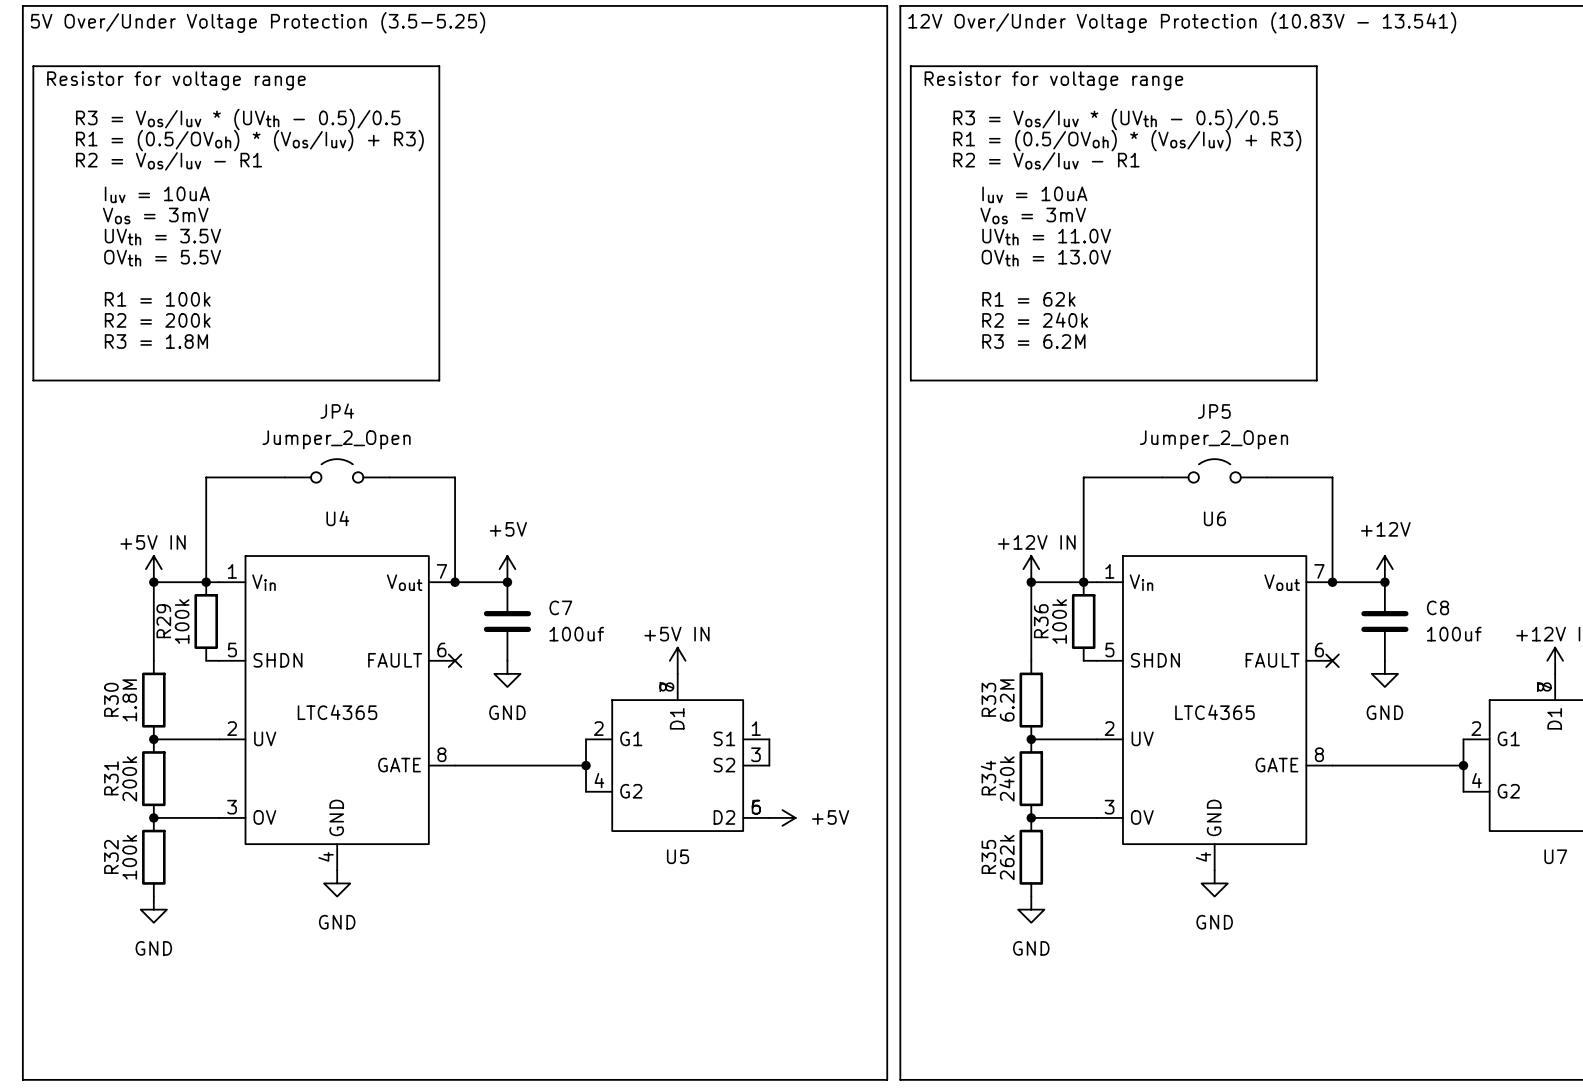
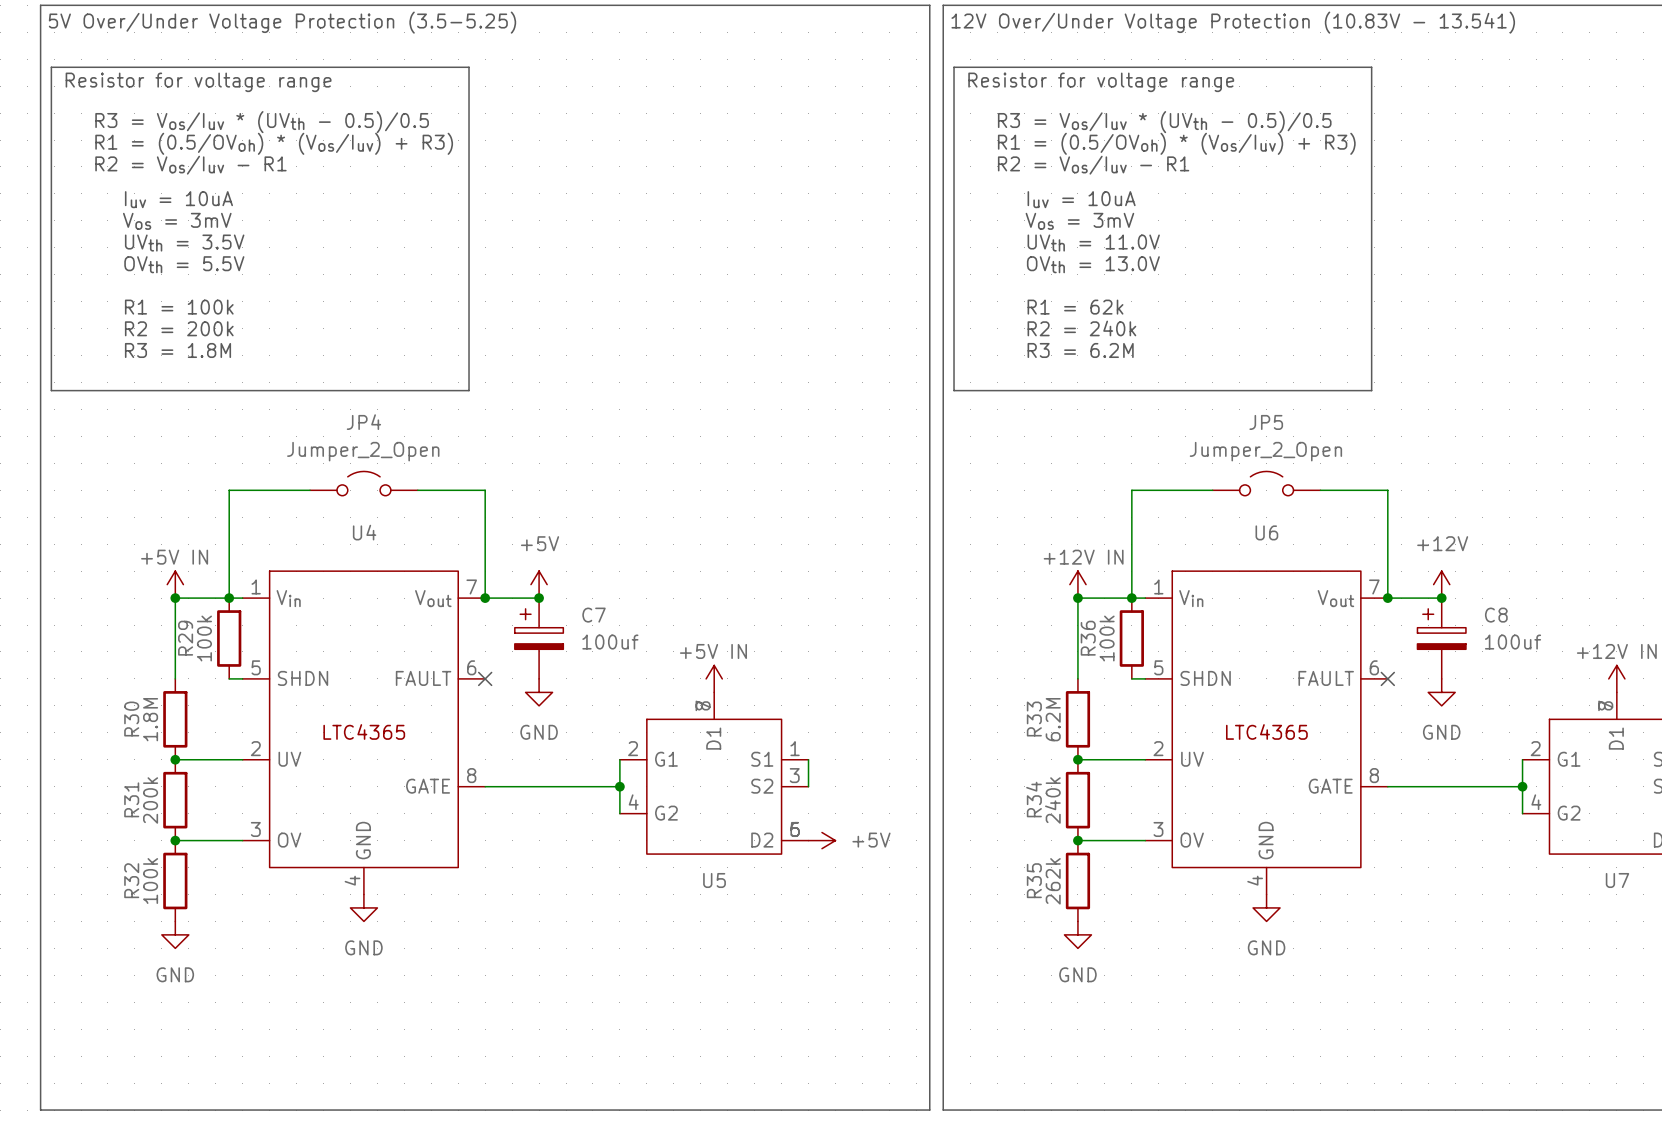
C7 symbol: [483, 582, 532, 661] -> [514, 598, 564, 679]
C8 symbol: [1361, 582, 1409, 661] -> [1417, 598, 1466, 679]

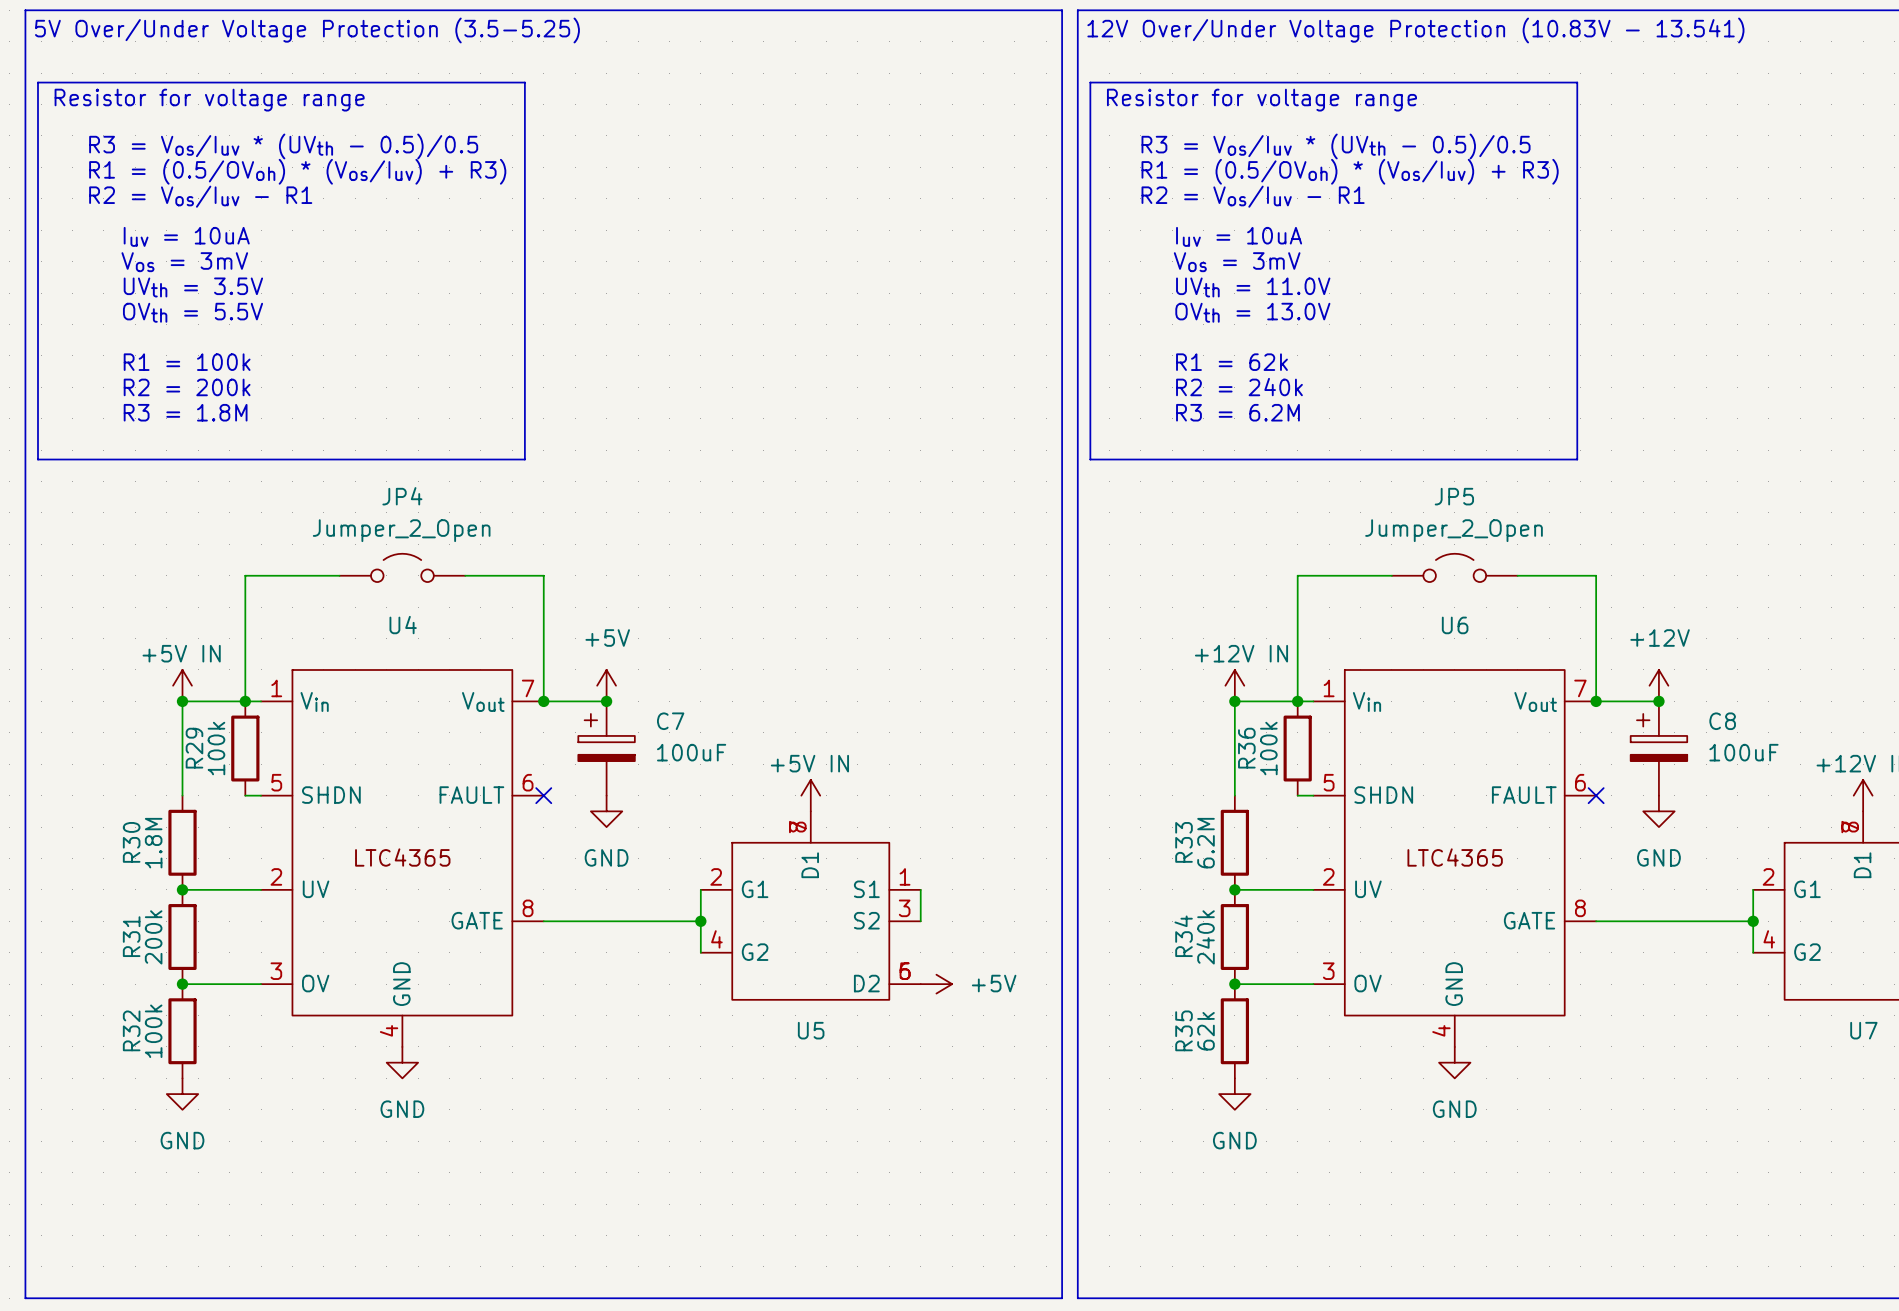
C7 value: 100uf (610, 642) -> 100uF (691, 752)
C8 value: 100uf (1513, 642) -> 100uF (1743, 752)
R35 value: 262k (1053, 881) -> 62k (1206, 1031)

